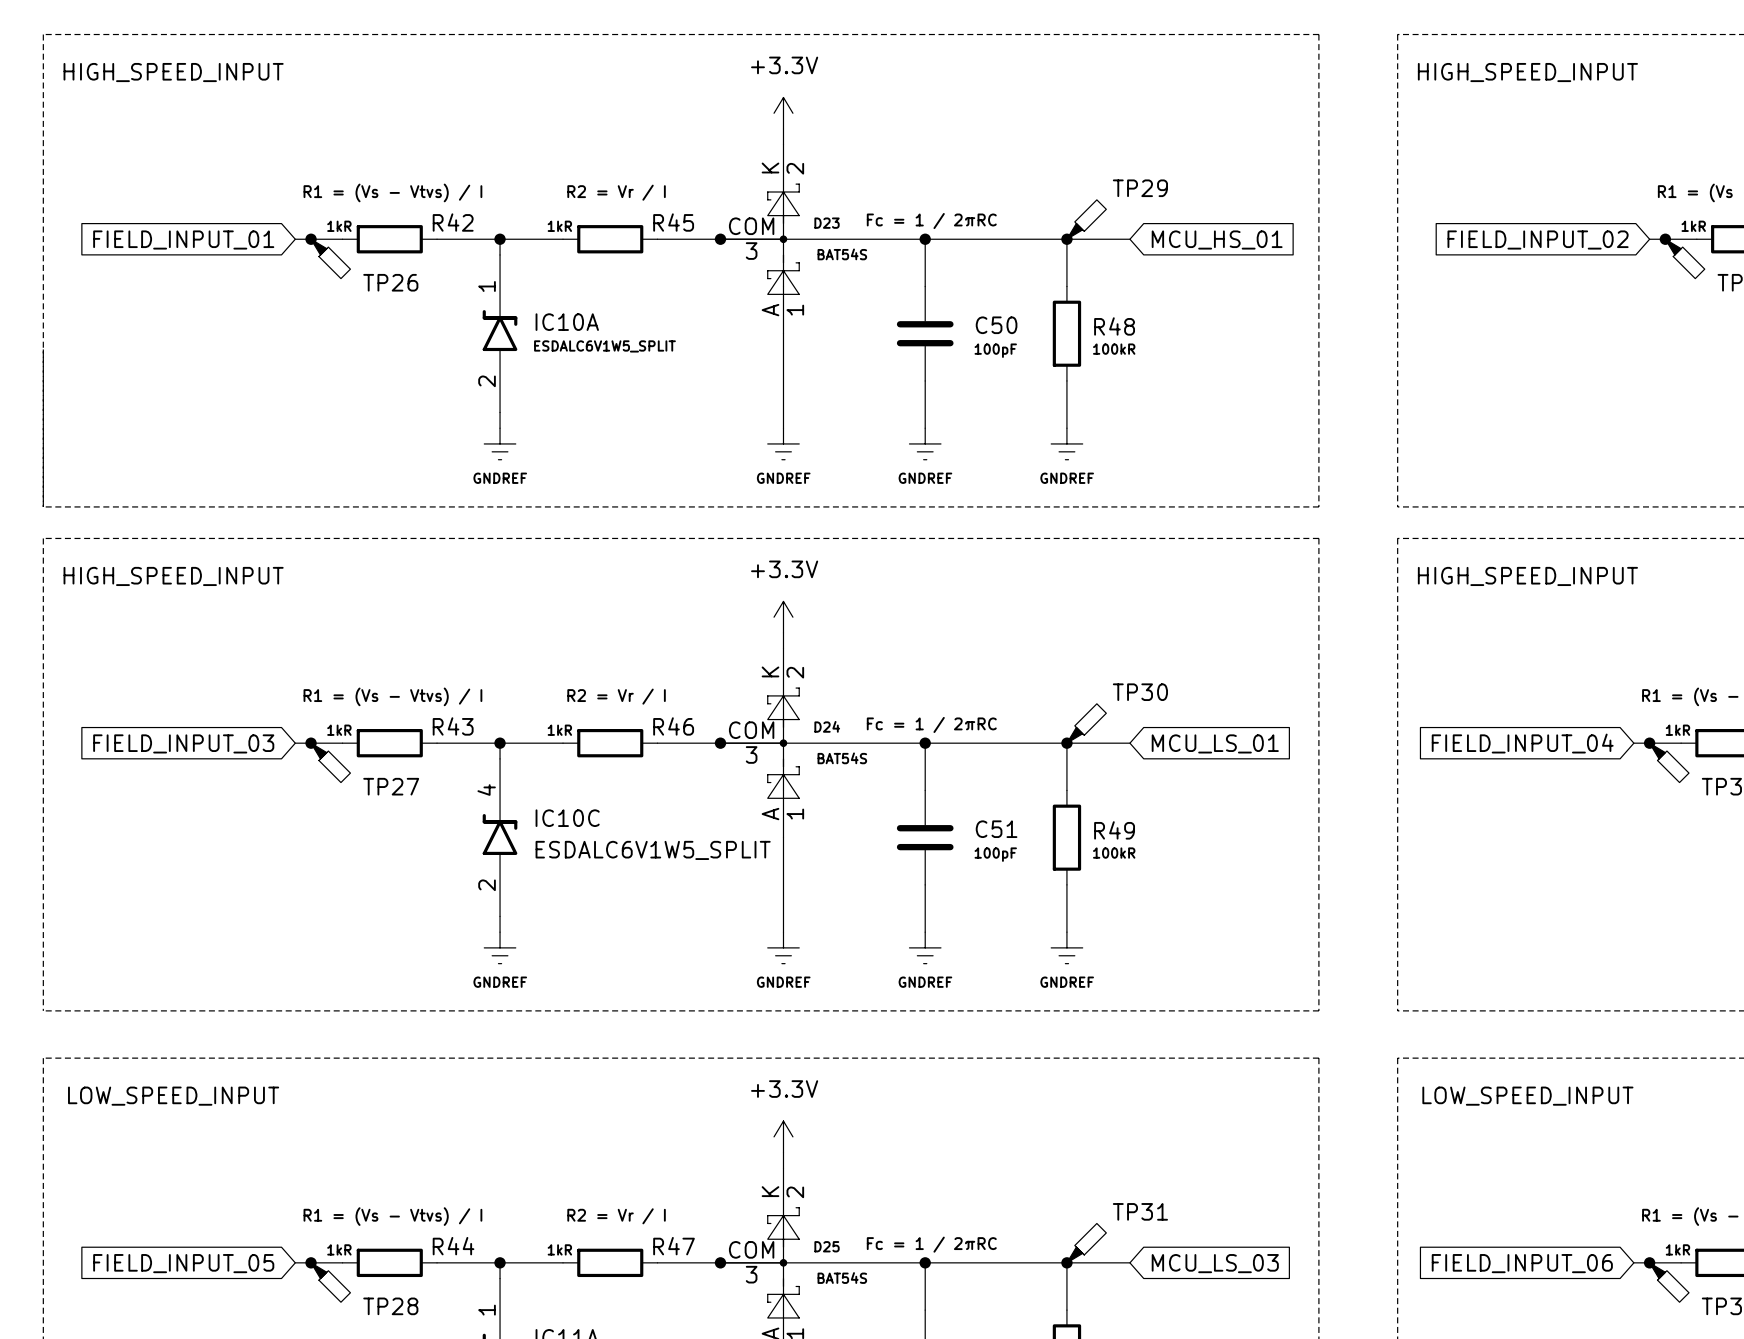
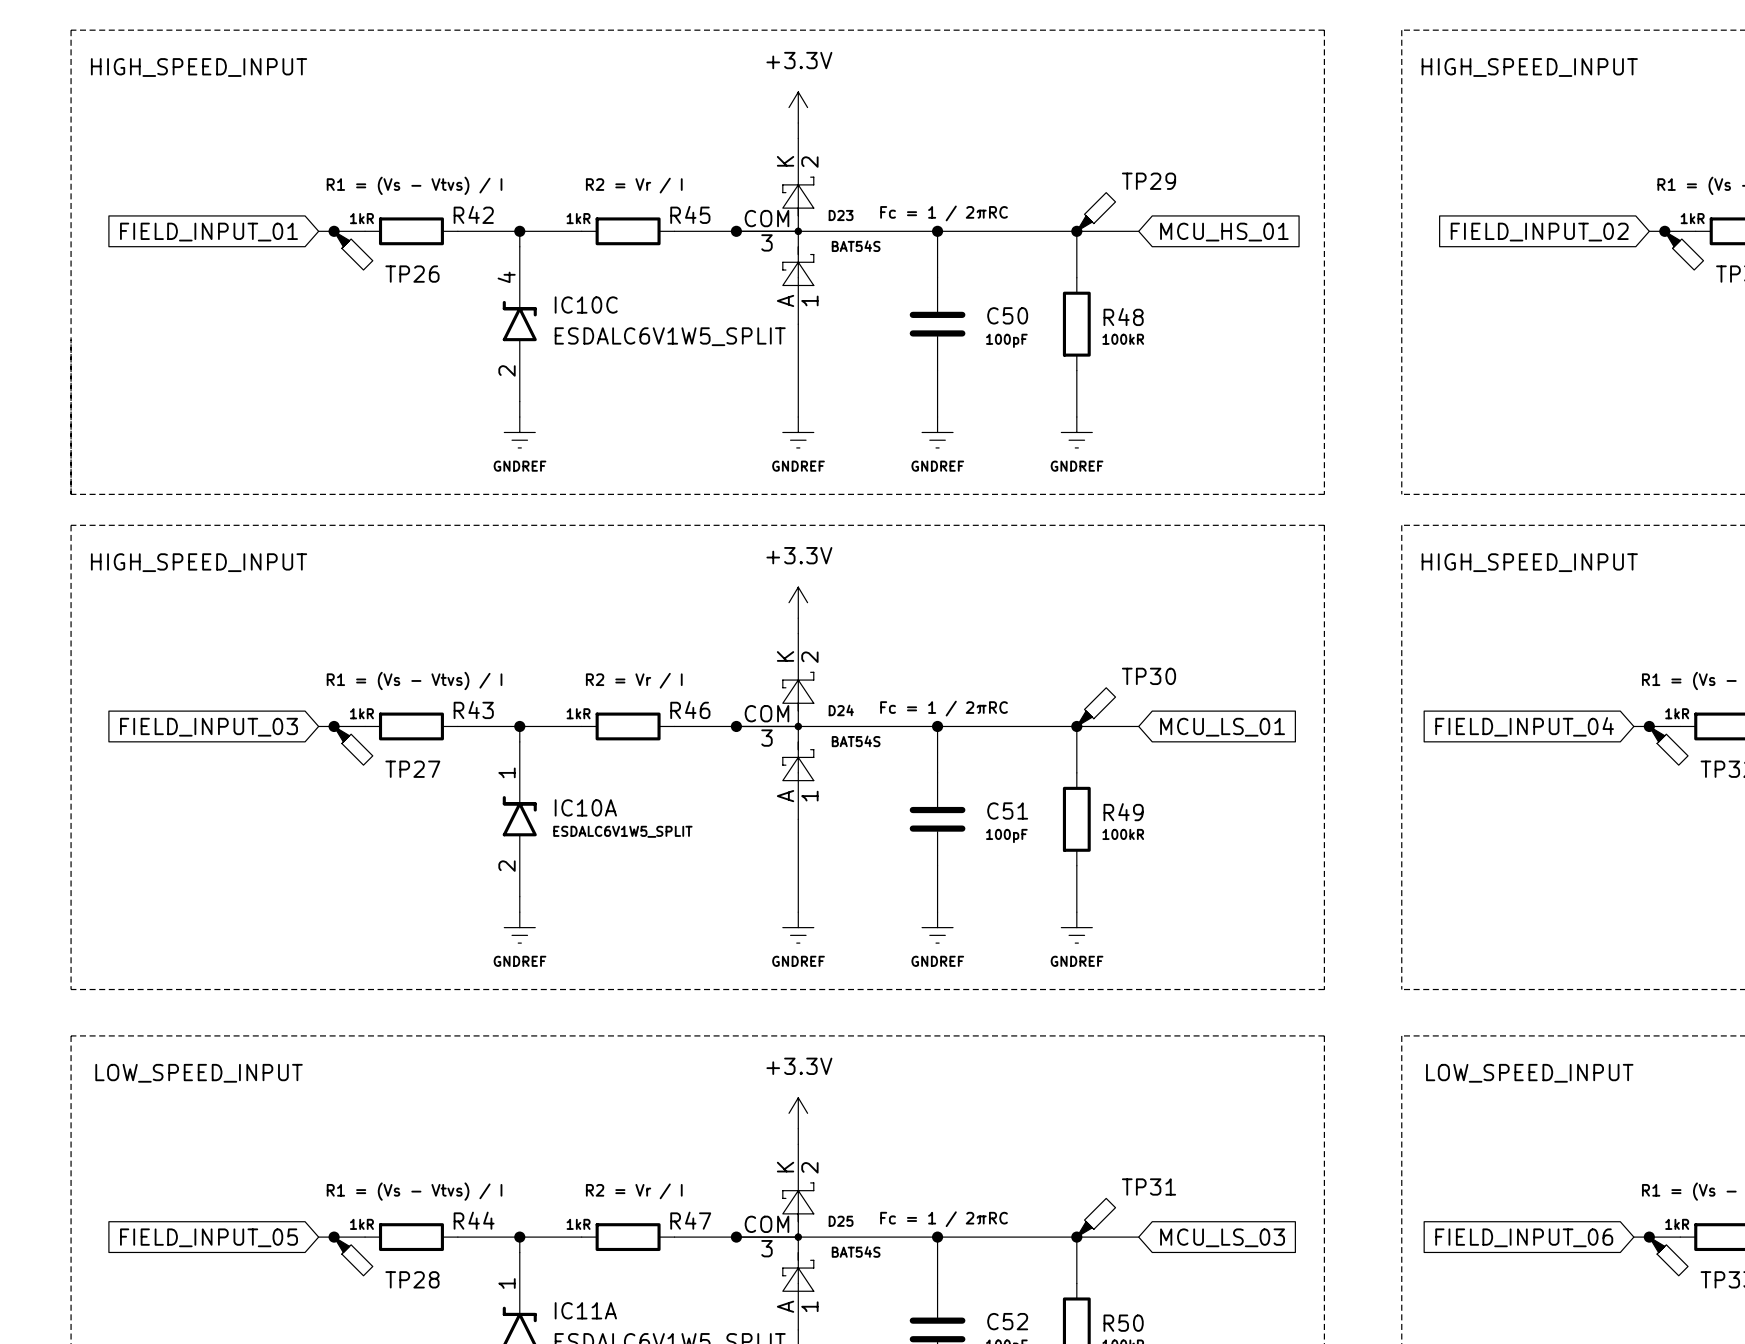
IC10A position: (500, 333) -> (519, 819)
IC10C position: (500, 837) -> (519, 324)

